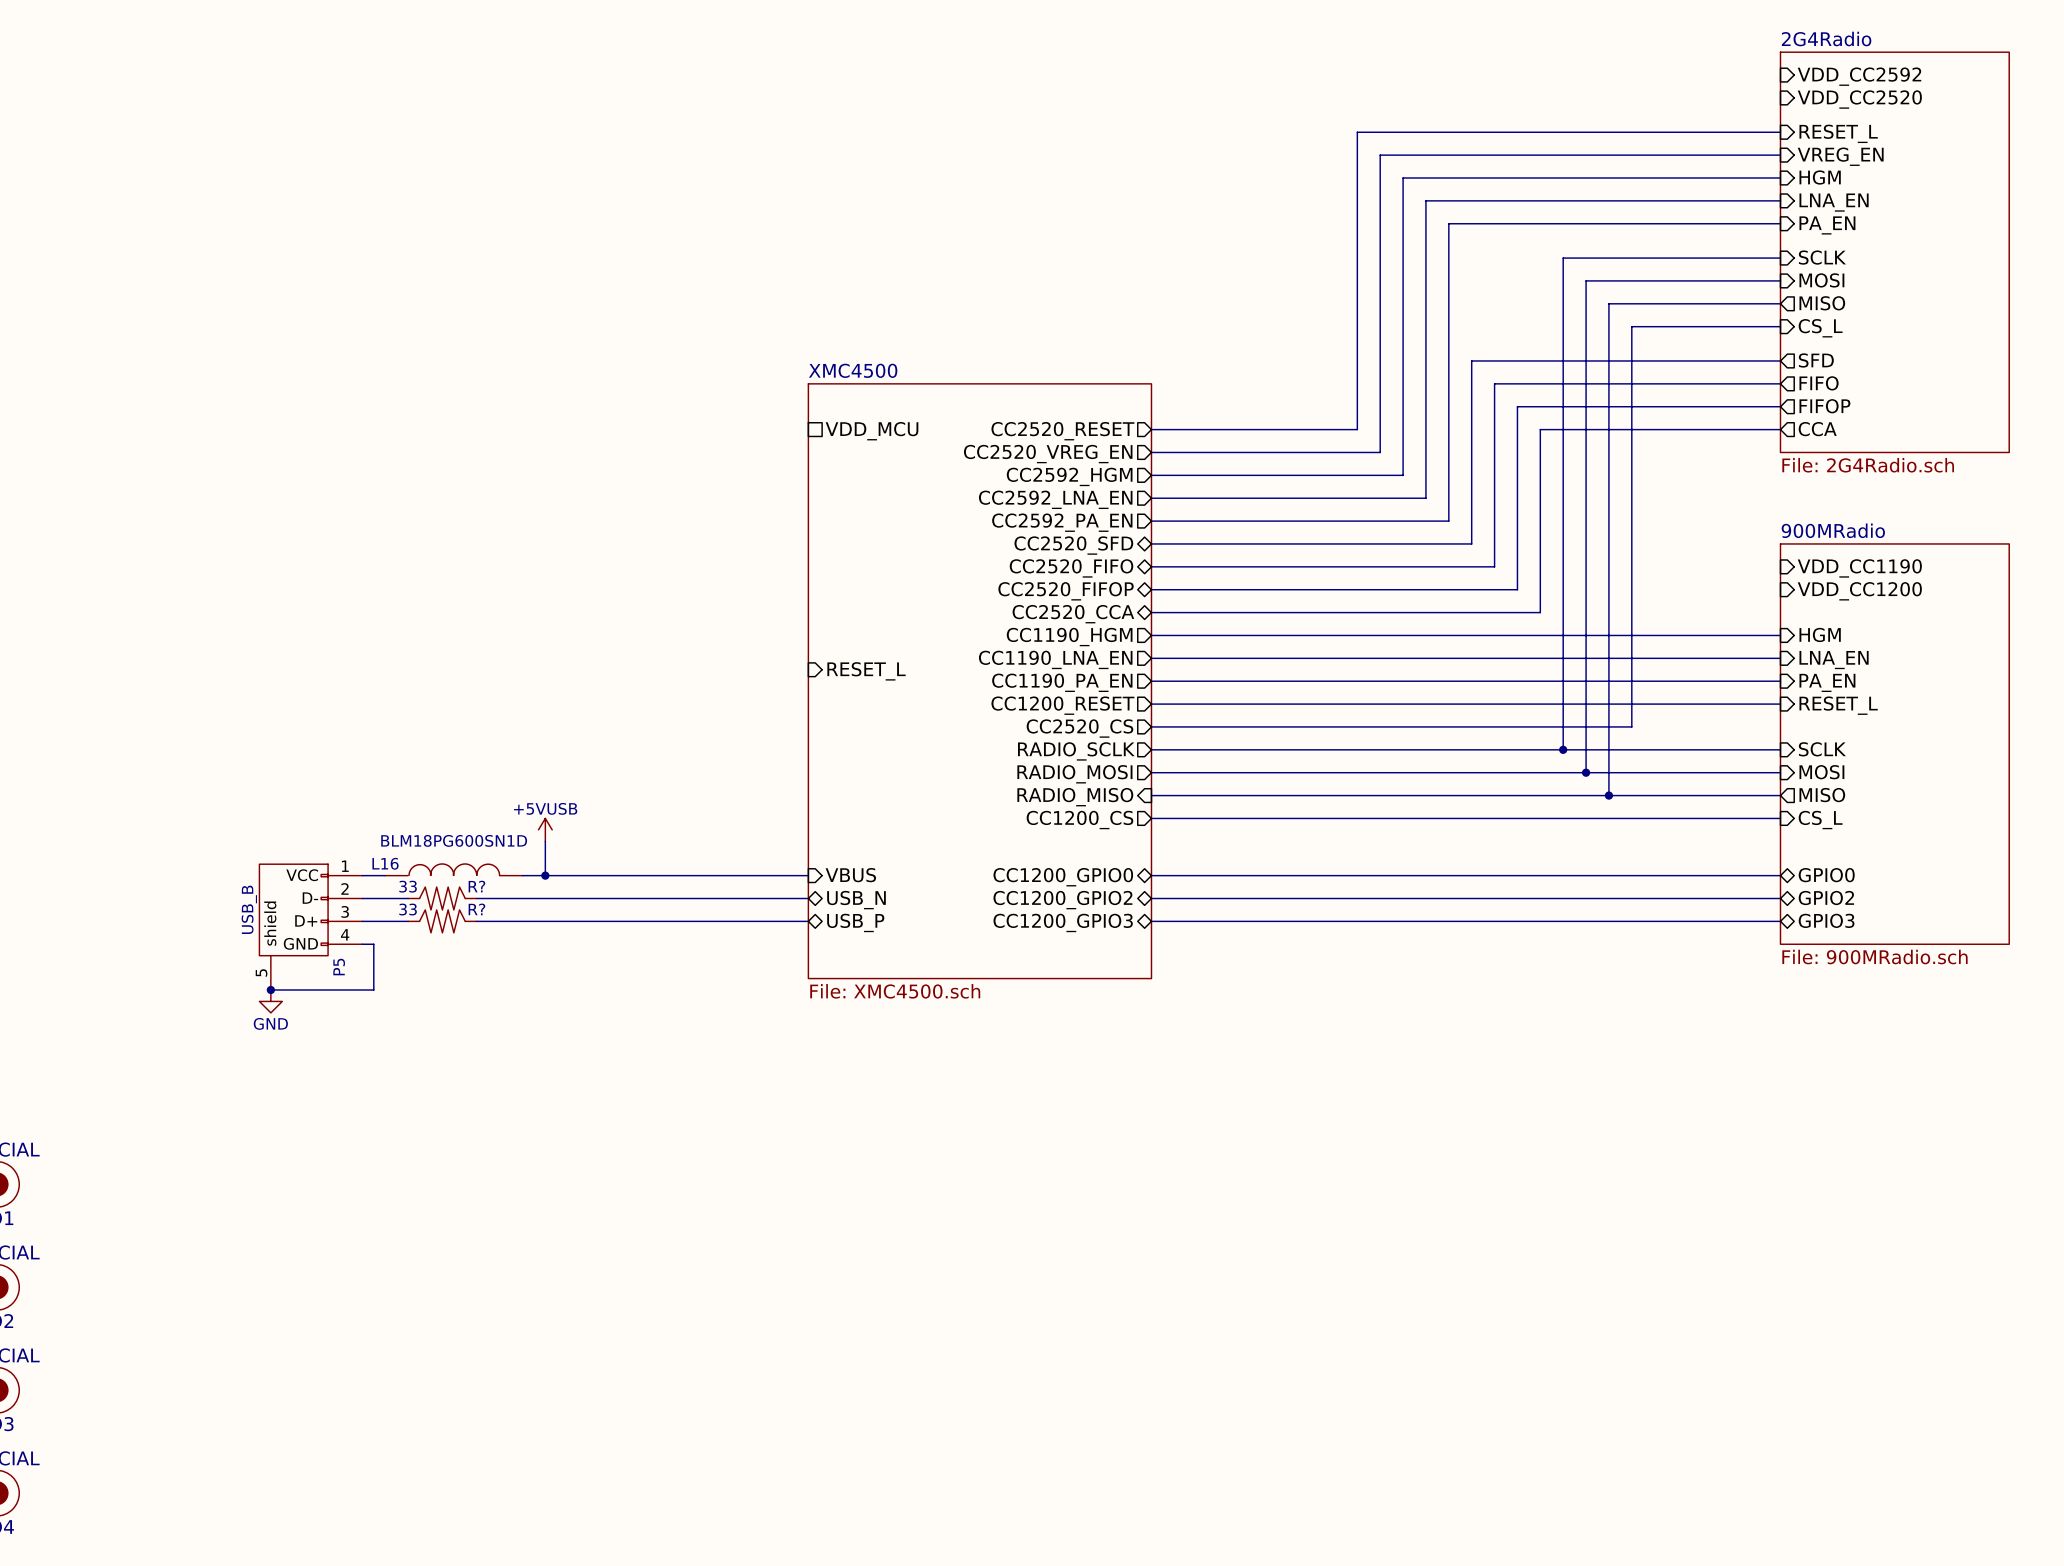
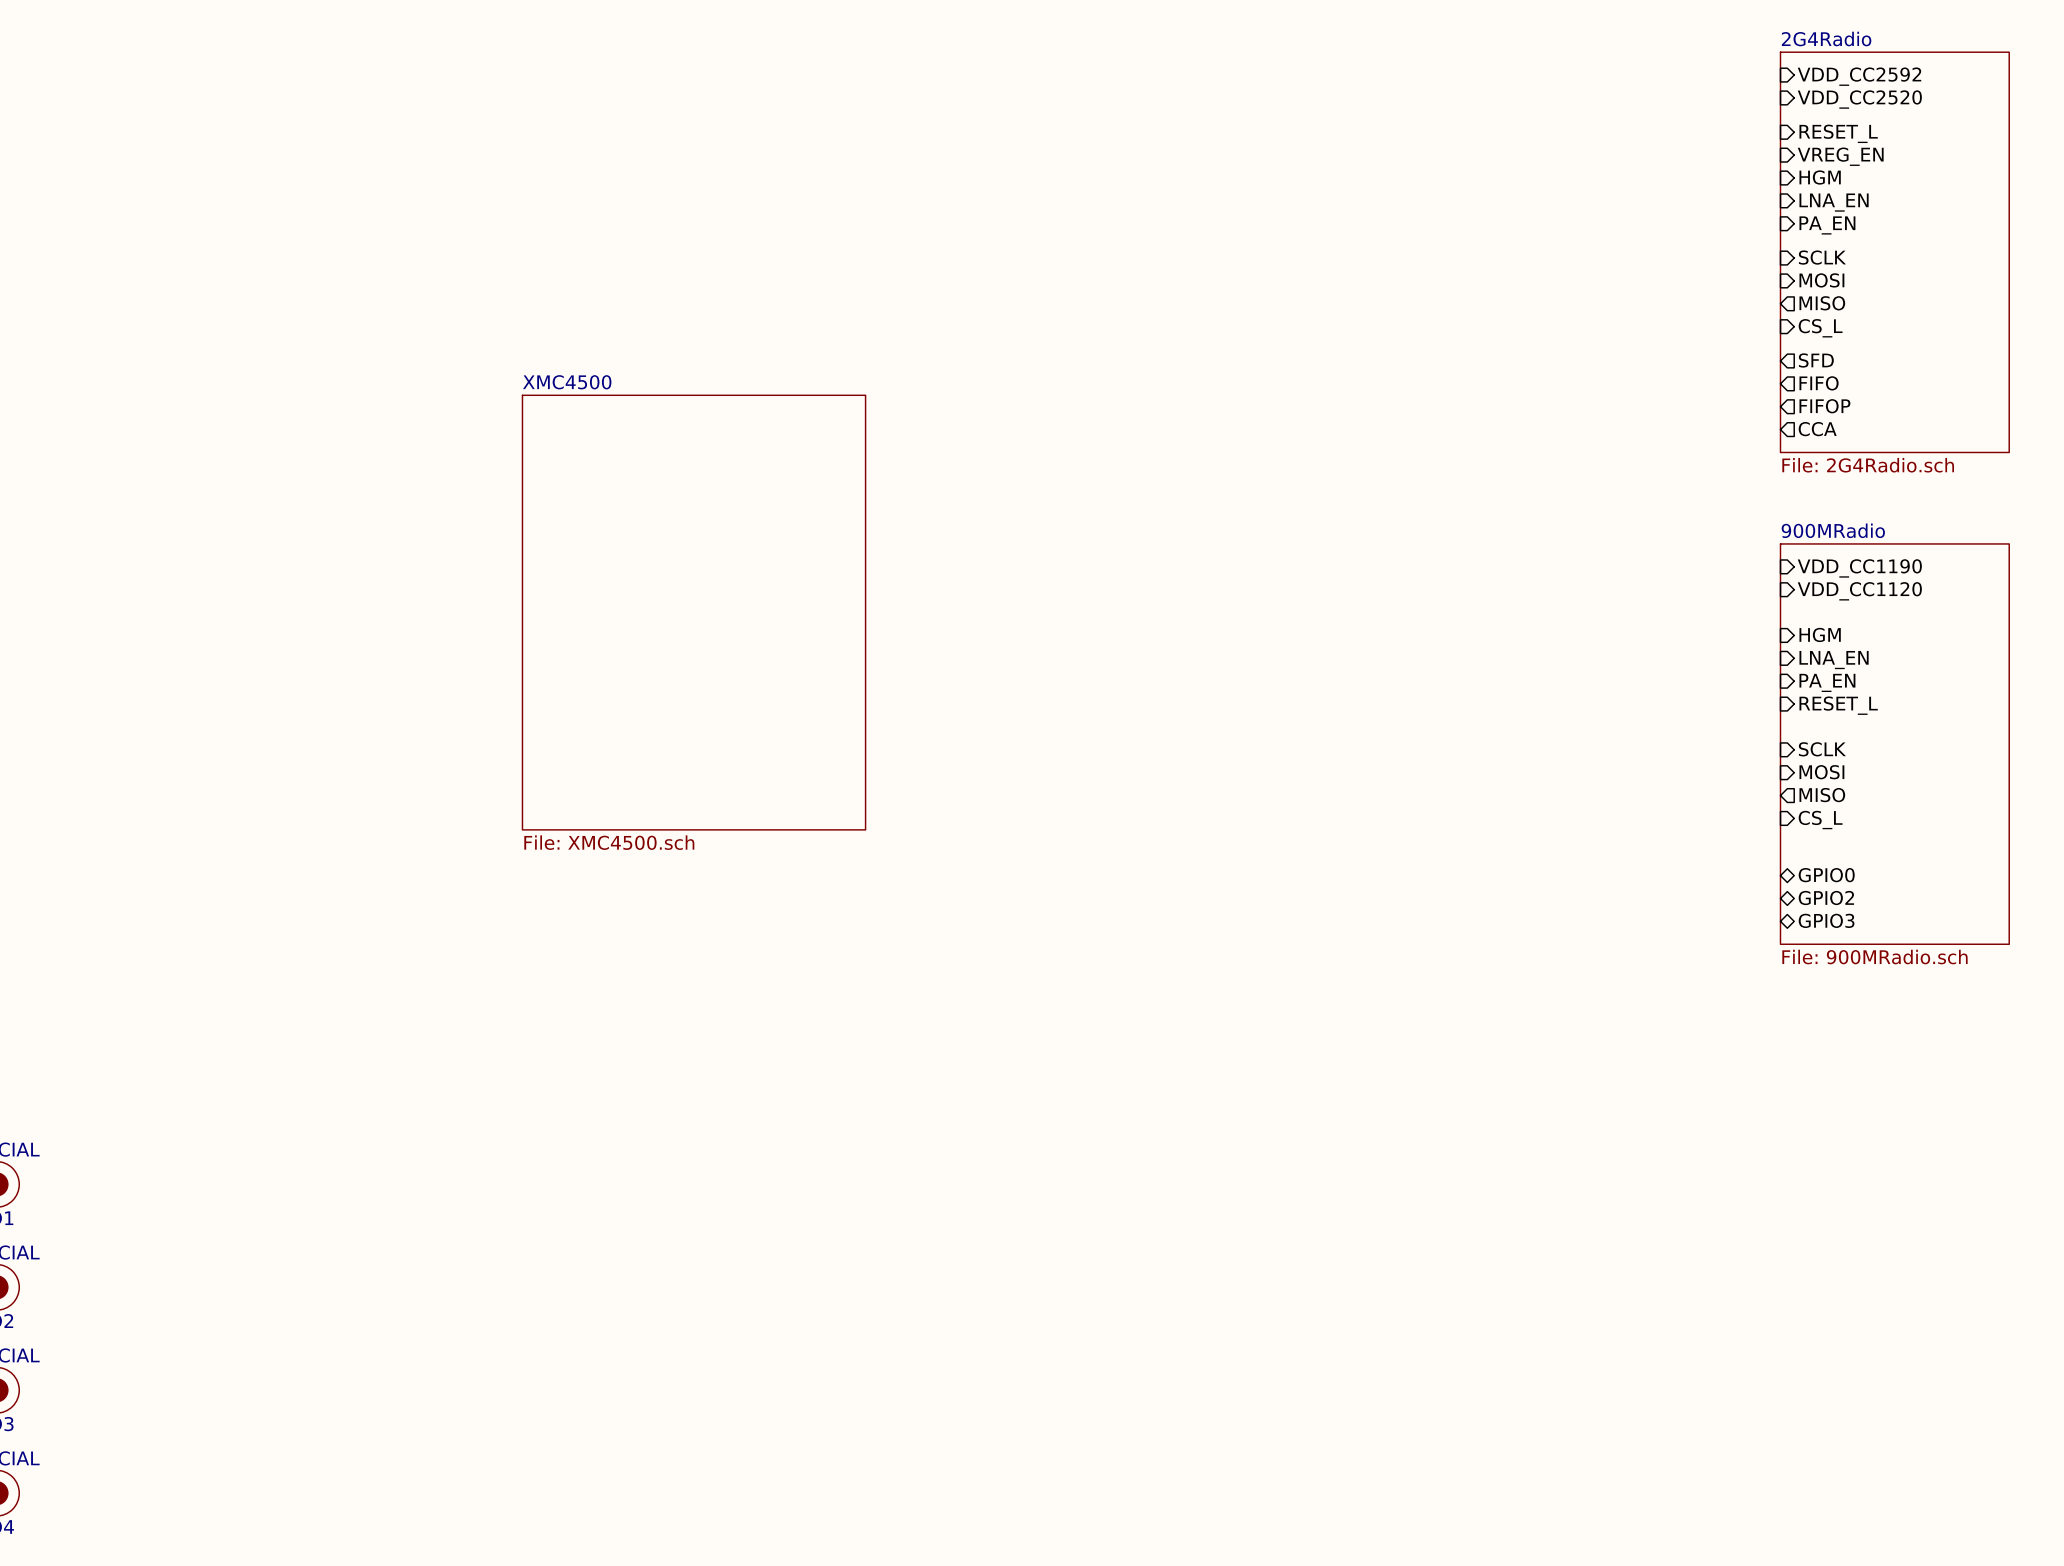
wire: (1780, 132) (1357, 132) (1357, 429) (1151, 429) -> none
wire: (1780, 155) (1380, 155) (1380, 452) (1151, 452) -> none
wire: (1780, 178) (1403, 178) (1403, 475) (1151, 475) -> none
wire: (1780, 200) (1425, 200) (1425, 498) (1151, 498) -> none
wire: (1780, 223) (1448, 223) (1448, 521) (1151, 521) -> none
wire: (1780, 258) (1563, 258) (1563, 749) -> none
wire: (1780, 280) (1586, 280) (1586, 772) -> none
wire: (1780, 303) (1608, 303) (1608, 795) -> none
wire: (1780, 326) (1631, 326) (1631, 726) (1151, 726) -> none
wire: (1780, 360) (1471, 360) (1471, 543) (1151, 543) -> none
sheet XMC4500 name position: XMC4500 (853, 370) -> XMC4500 (567, 382)
sheet XMC4500 shape: [808, 383, 1152, 979] -> [522, 395, 866, 830]
wire: (1780, 383) (1494, 383) (1494, 566) (1151, 566) -> none
wire: (1780, 406) (1517, 406) (1517, 589) (1151, 589) -> none
wire: (1780, 429) (1540, 429) (1540, 612) (1151, 612) -> none
sheet pin: VDD_MCU (872, 431) -> none
sheet pin: CC2520_RESET (1062, 431) -> none
sheet pin: CC2520_VREG_EN (1048, 454) -> none
sheet pin: CC2592_HGM (1069, 476) -> none
sheet pin: CC2592_LNA_EN (1055, 499) -> none
sheet pin: CC2592_PA_EN (1062, 522) -> none
sheet pin: CC2520_SFD (1073, 545) -> none
sheet pin: CC2520_FIFO (1071, 568) -> none
sheet pin: CC2520_FIFOP (1066, 591) -> none
sheet pin: VDD_CC1200 (1859, 591) -> VDD_CC1120 (1859, 591)
sheet pin: CC2520_CCA (1073, 614) -> none
wire: (1151, 635) (1780, 635) -> none
sheet pin: CC1190_HGM (1069, 637) -> none
wire: (1151, 658) (1780, 658) -> none
sheet pin: CC1190_LNA_EN (1055, 659) -> none
sheet pin: RESET_L (866, 671) -> none
wire: (1151, 681) (1780, 681) -> none
sheet pin: CC1190_PA_EN (1062, 682) -> none
wire: (1151, 704) (1780, 704) -> none
sheet pin: CC1200_RESET (1062, 705) -> none
sheet pin: CC2520_CS (1079, 728) -> none
wire: (1151, 749) (1780, 749) -> none
junction: (1563, 749) -> none
sheet pin: RADIO_SCLK (1076, 751) -> none
wire: (1151, 772) (1780, 772) -> none
junction: (1586, 772) -> none
sheet pin: RADIO_MOSI (1074, 774) -> none
wire: (1151, 795) (1780, 795) -> none
junction: (1608, 795) -> none
sheet pin: RADIO_MISO (1075, 797) -> none
wire: (1151, 818) (1780, 818) -> none
sheet pin: CC1200_CS (1079, 820) -> none
power symbol: +5VUSB (545, 829) -> none
wire: (545, 841) (545, 875) -> none
L16: BLM18PG600SN1D (453, 869) -> none
wire: (362, 875) (385, 875) -> none
wire: (522, 875) (808, 875) -> none
junction: (545, 875) -> none
sheet pin: VBUS (850, 875) -> none
wire: (1151, 875) (1780, 875) -> none
sheet pin: CC1200_GPIO0 (1063, 877) -> none
wire: (362, 898) (408, 898) -> none
R?: 33 (442, 898) -> none
wire: (476, 898) (808, 898) -> none
wire: (1151, 898) (1780, 898) -> none
sheet pin: USB_N (856, 900) -> none
sheet pin: CC1200_GPIO2 (1062, 900) -> none
wire: (362, 921) (408, 921) -> none
R?: 33 (442, 921) -> none
wire: (476, 921) (808, 921) -> none
wire: (1151, 921) (1780, 921) -> none
sheet pin: USB_P (855, 922) -> none
sheet pin: CC1200_GPIO3 (1063, 922) -> none
P5: USB_B (310, 927) -> none
wire: (362, 944) (373, 944) (373, 990) (270, 990) -> none
junction: (270, 990) -> none
sheet XMC4500 value position: File: XMC4500.sch (895, 991) -> File: XMC4500.sch (609, 842)
power symbol: GND (270, 1001) -> none

